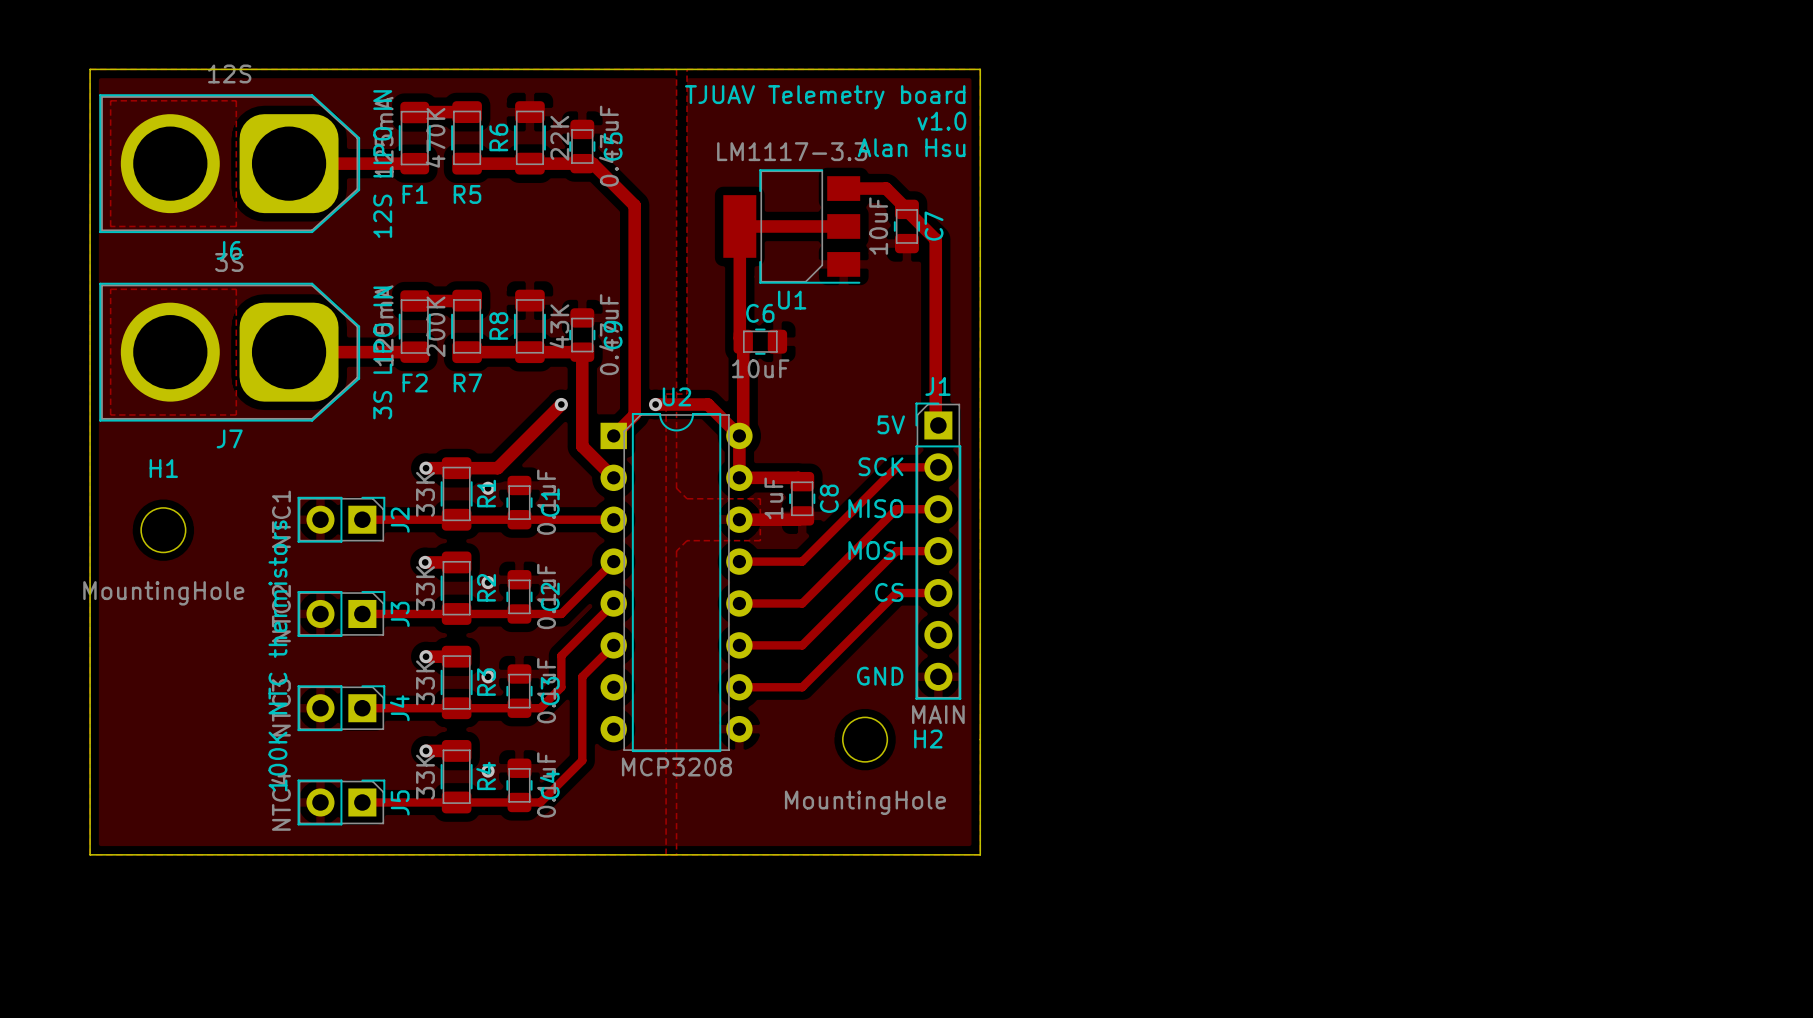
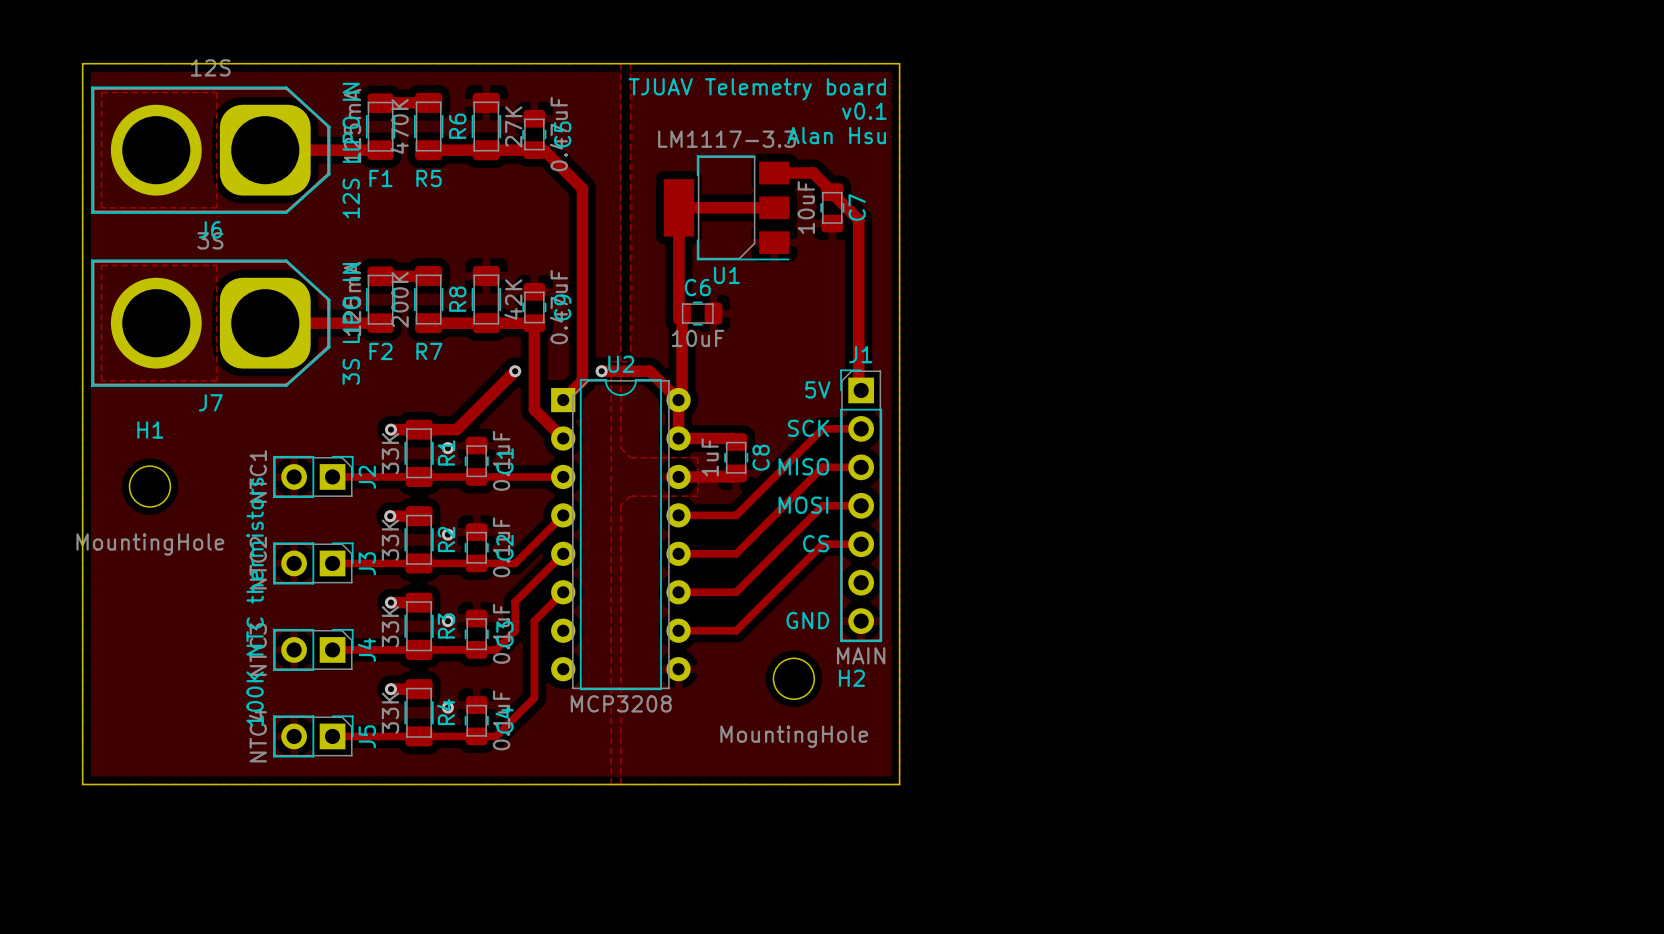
text: v1.0 (941, 121) -> v0.1 (864, 111)
R6 value: 22K (559, 138) -> 27K (513, 126)
R8 value: 43K (559, 326) -> 42K (513, 299)

